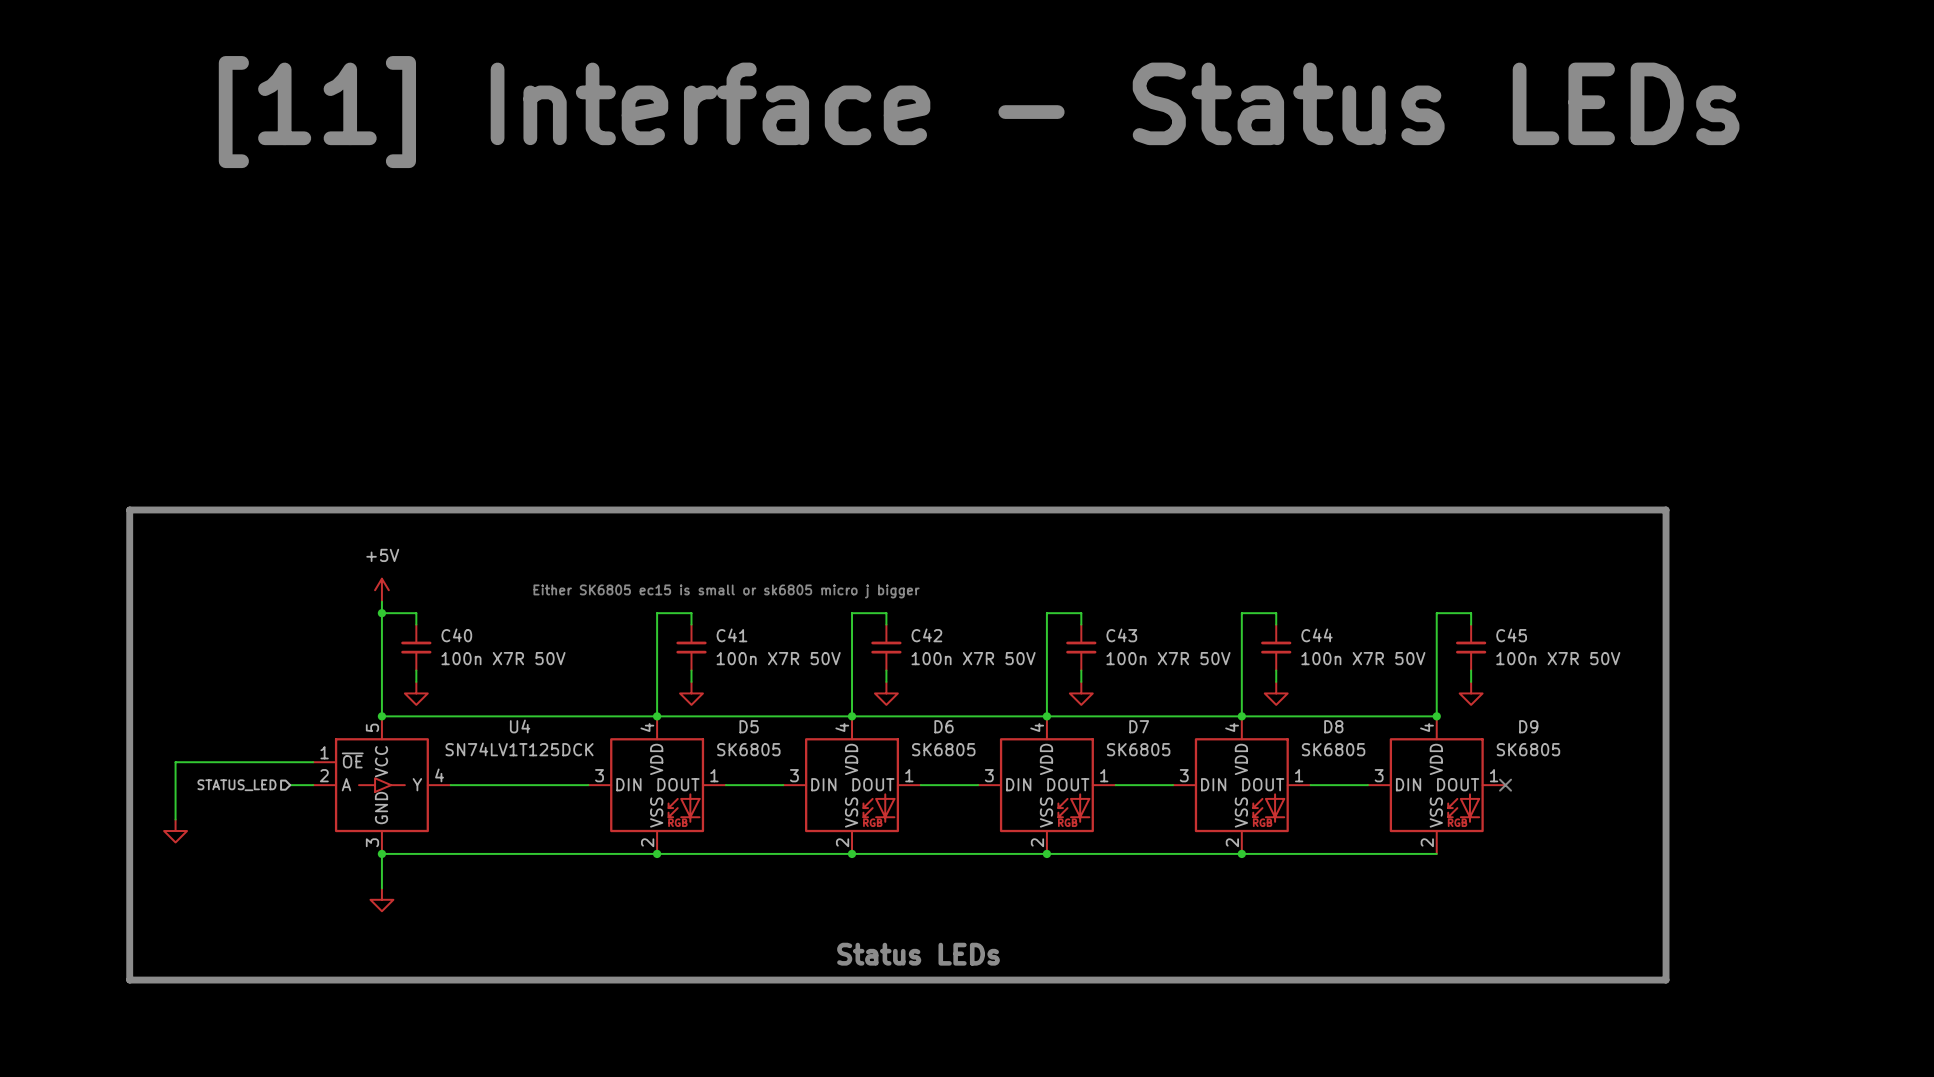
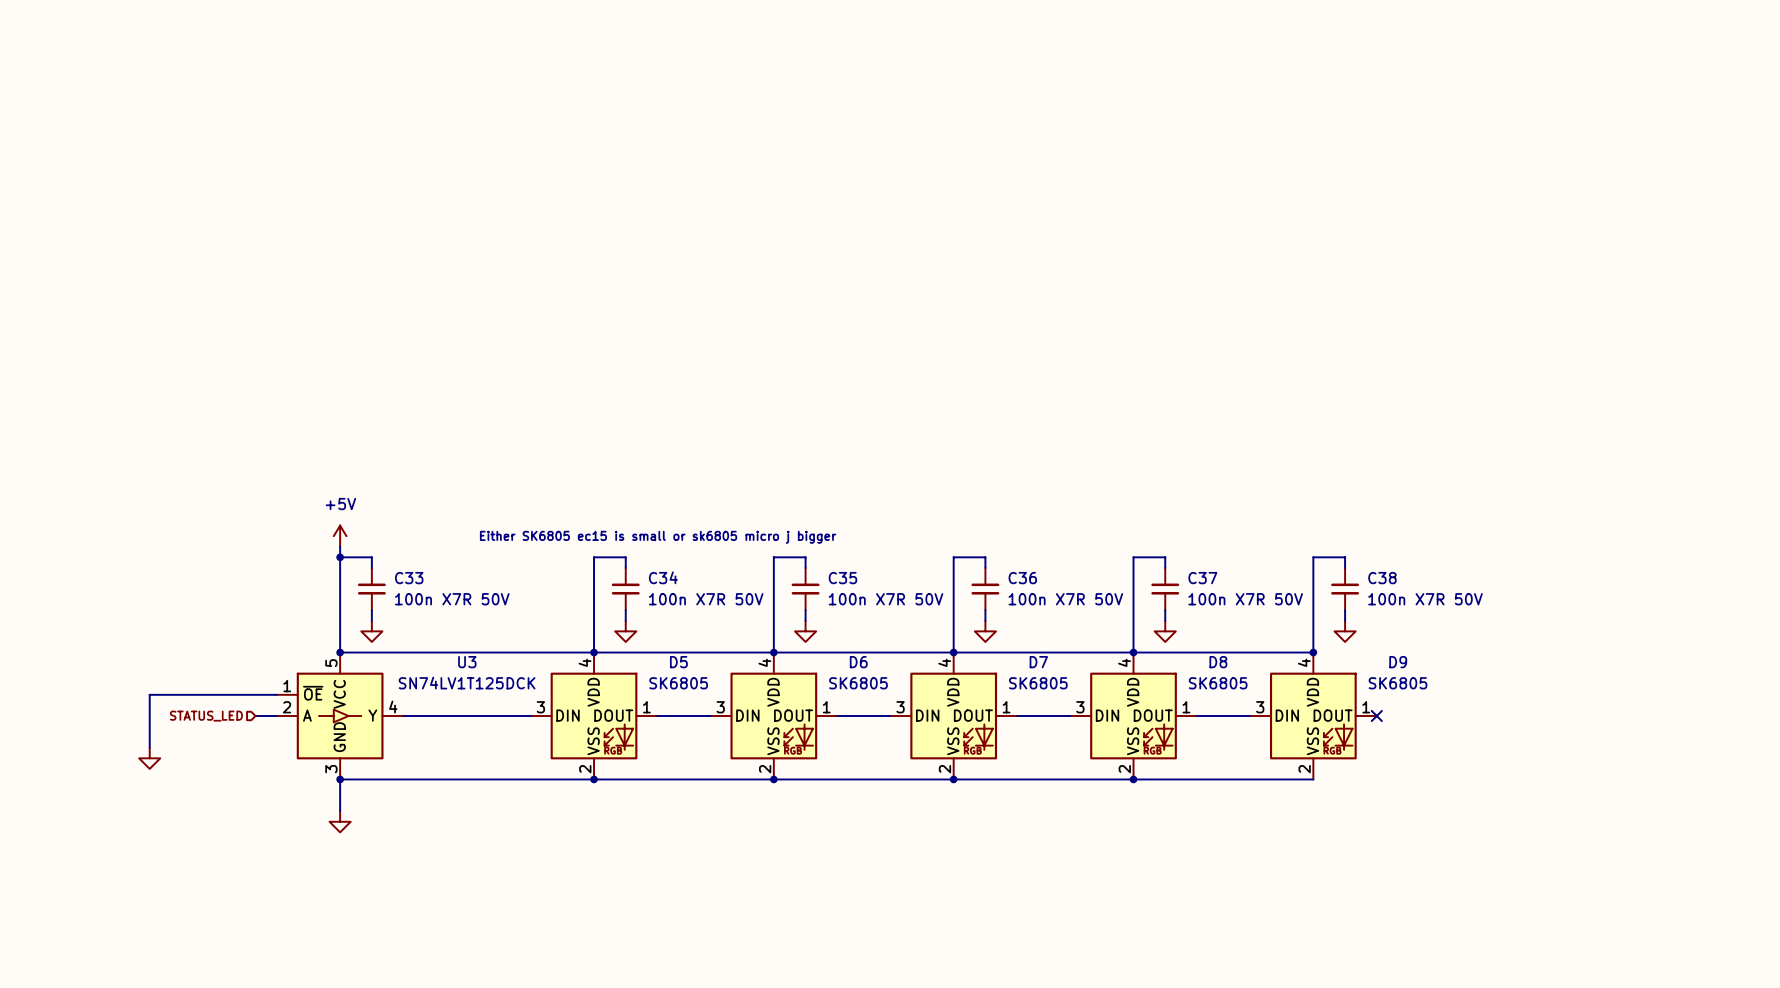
text: [11] Interface - Status LEDs (979, 112) -> none
line: (129, 509) (1666, 509) (1666, 980) (129, 980) (129, 509) -> none
C40 name: C40 (456, 635) -> C33 (409, 578)
C41 name: C41 (731, 635) -> C34 (663, 577)
C42 name: C42 (926, 635) -> C35 (842, 578)
C43 name: C43 (1121, 635) -> C36 (1022, 578)
C44 name: C44 (1316, 635) -> C37 (1202, 578)
C45 name: C45 (1511, 635) -> C38 (1382, 578)
U4 name: U4 (520, 726) -> U3 (467, 662)
text: Status LEDs (918, 954) -> none

